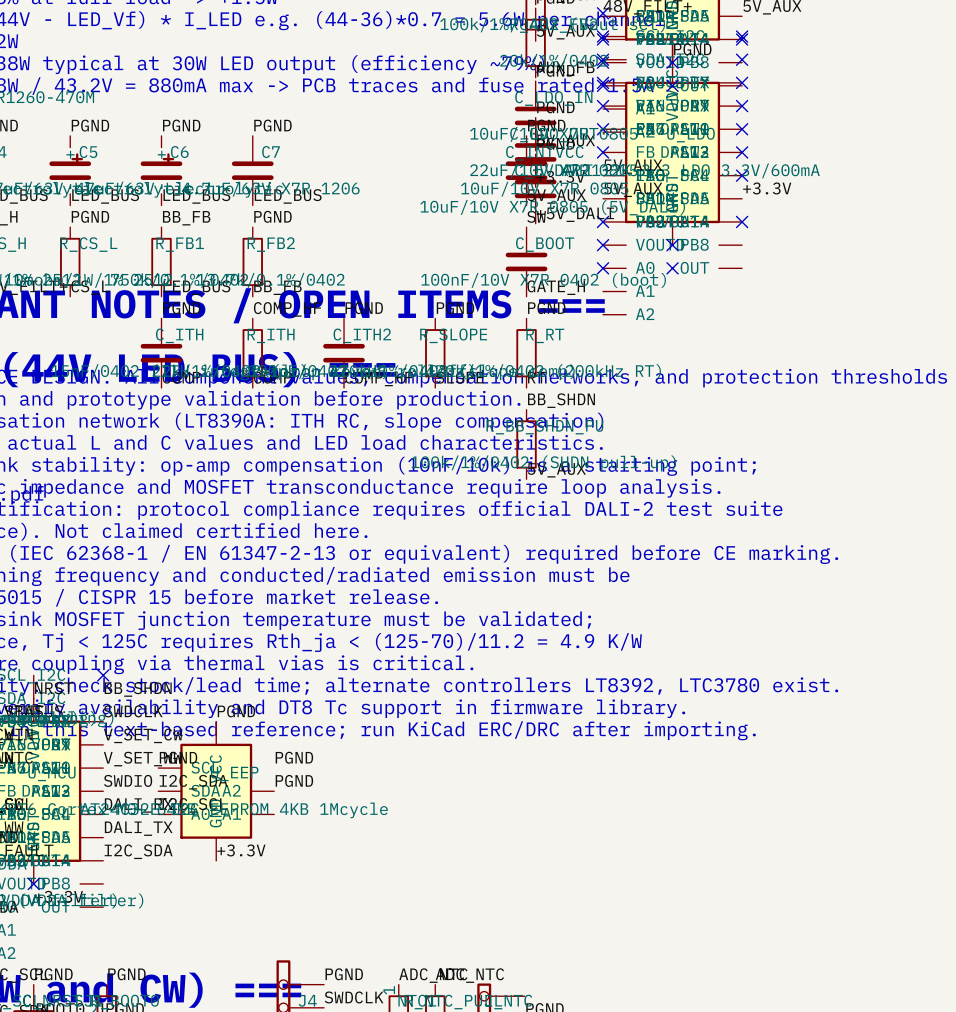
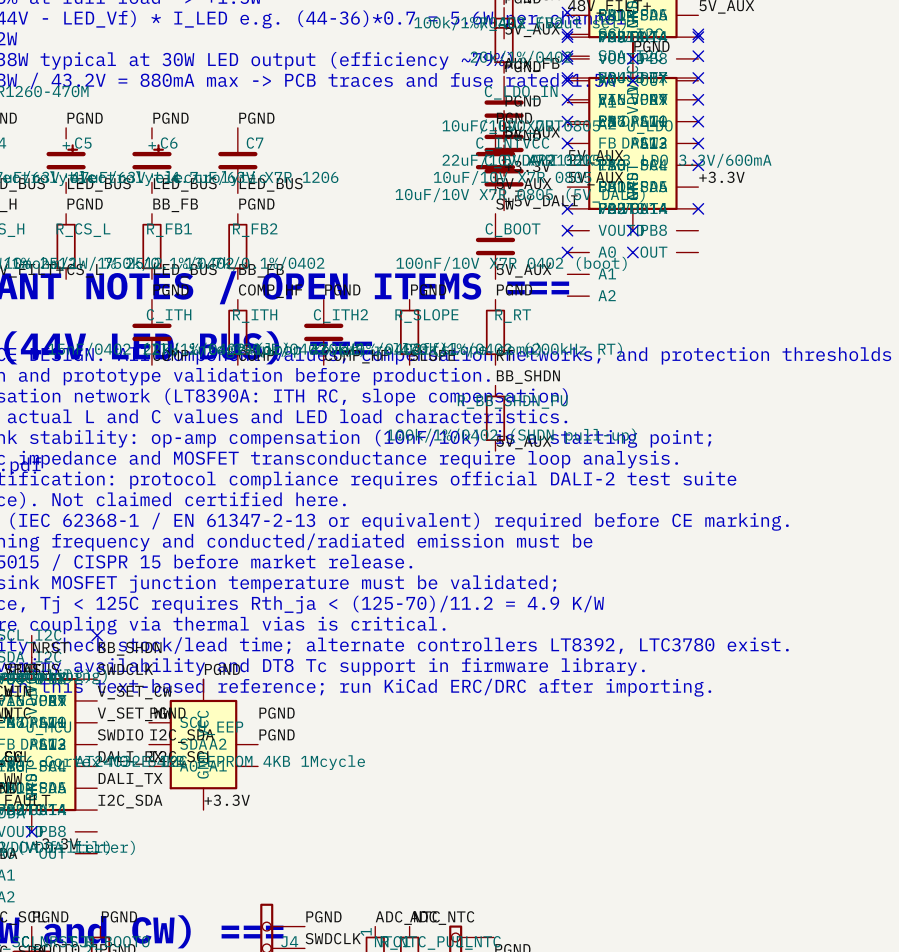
label: GATE_H (556, 287) -> 5V_AUX (523, 270)

